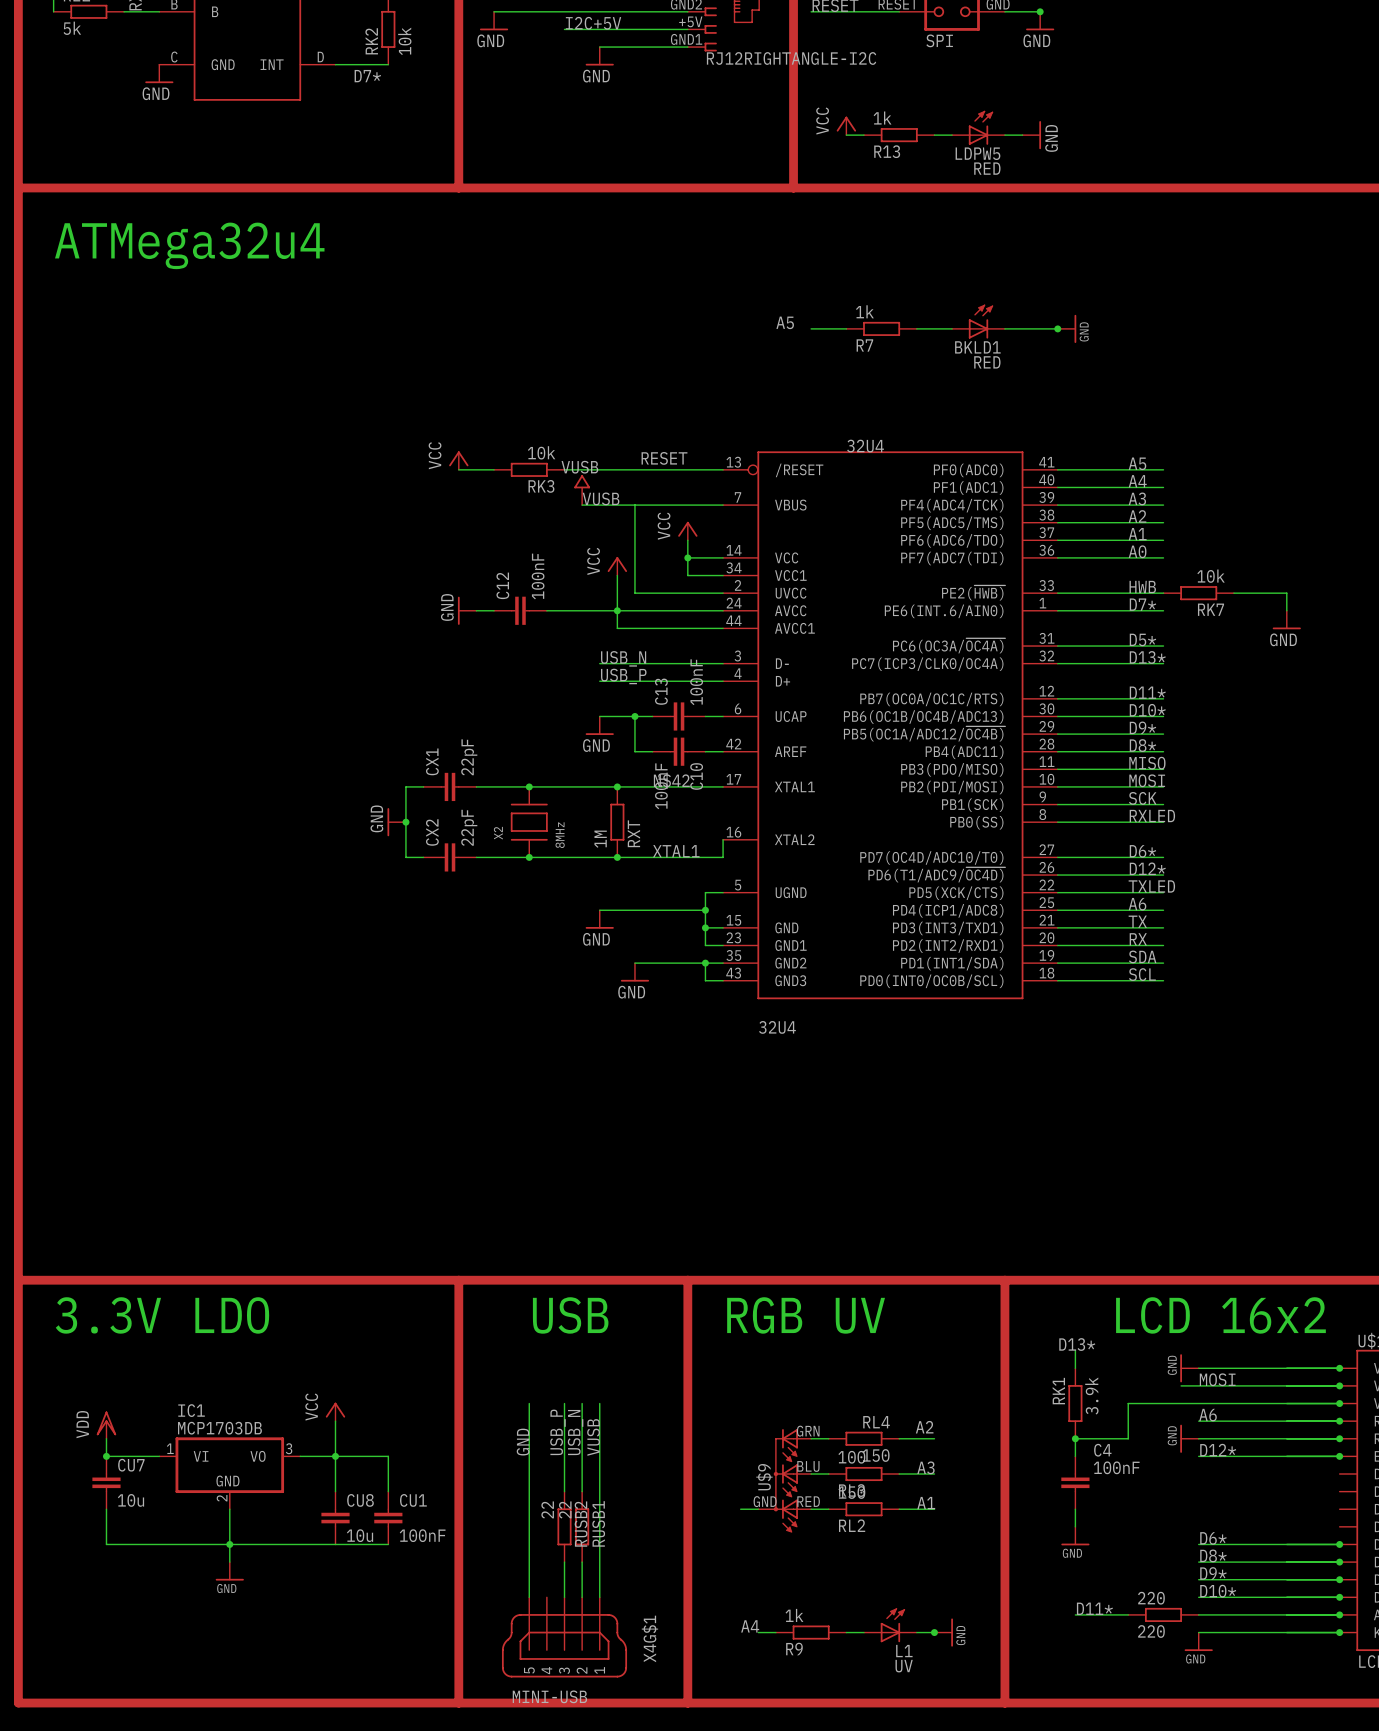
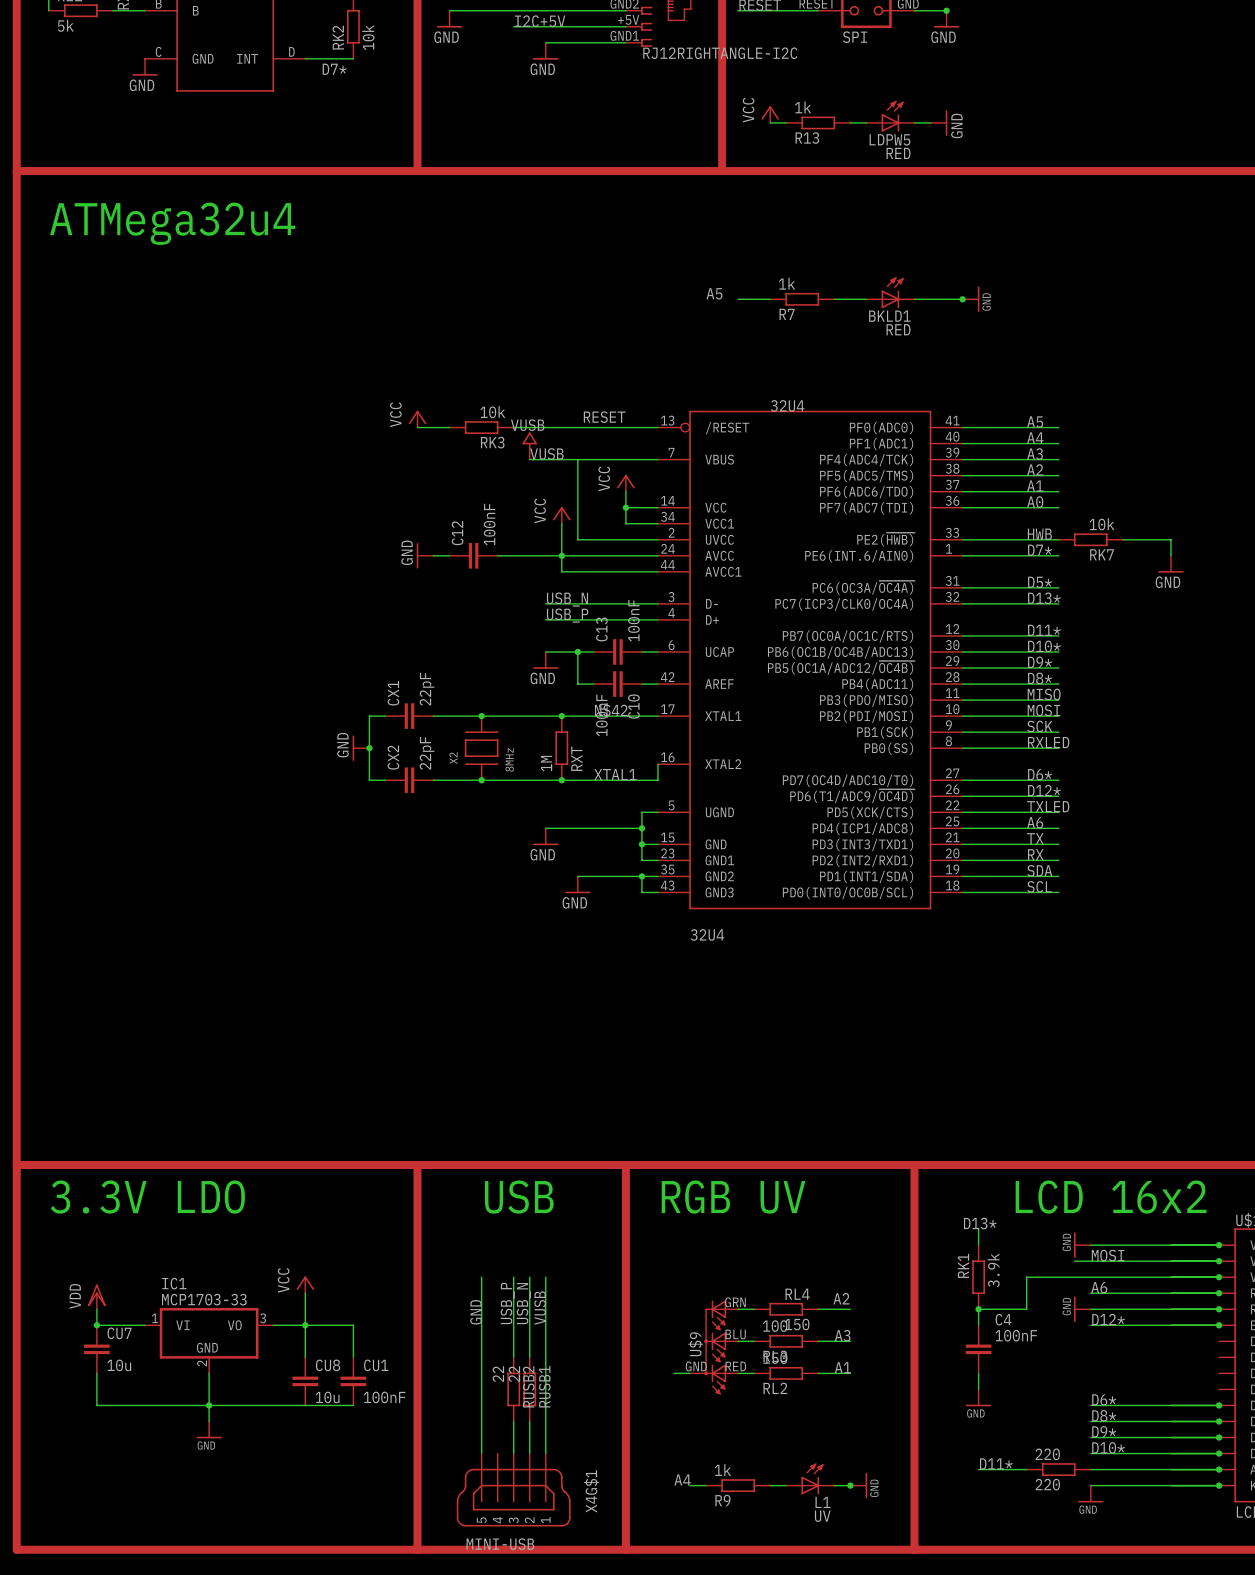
IC1 value: MCP1703DB (219, 1428) -> MCP1703-33 (204, 1299)

